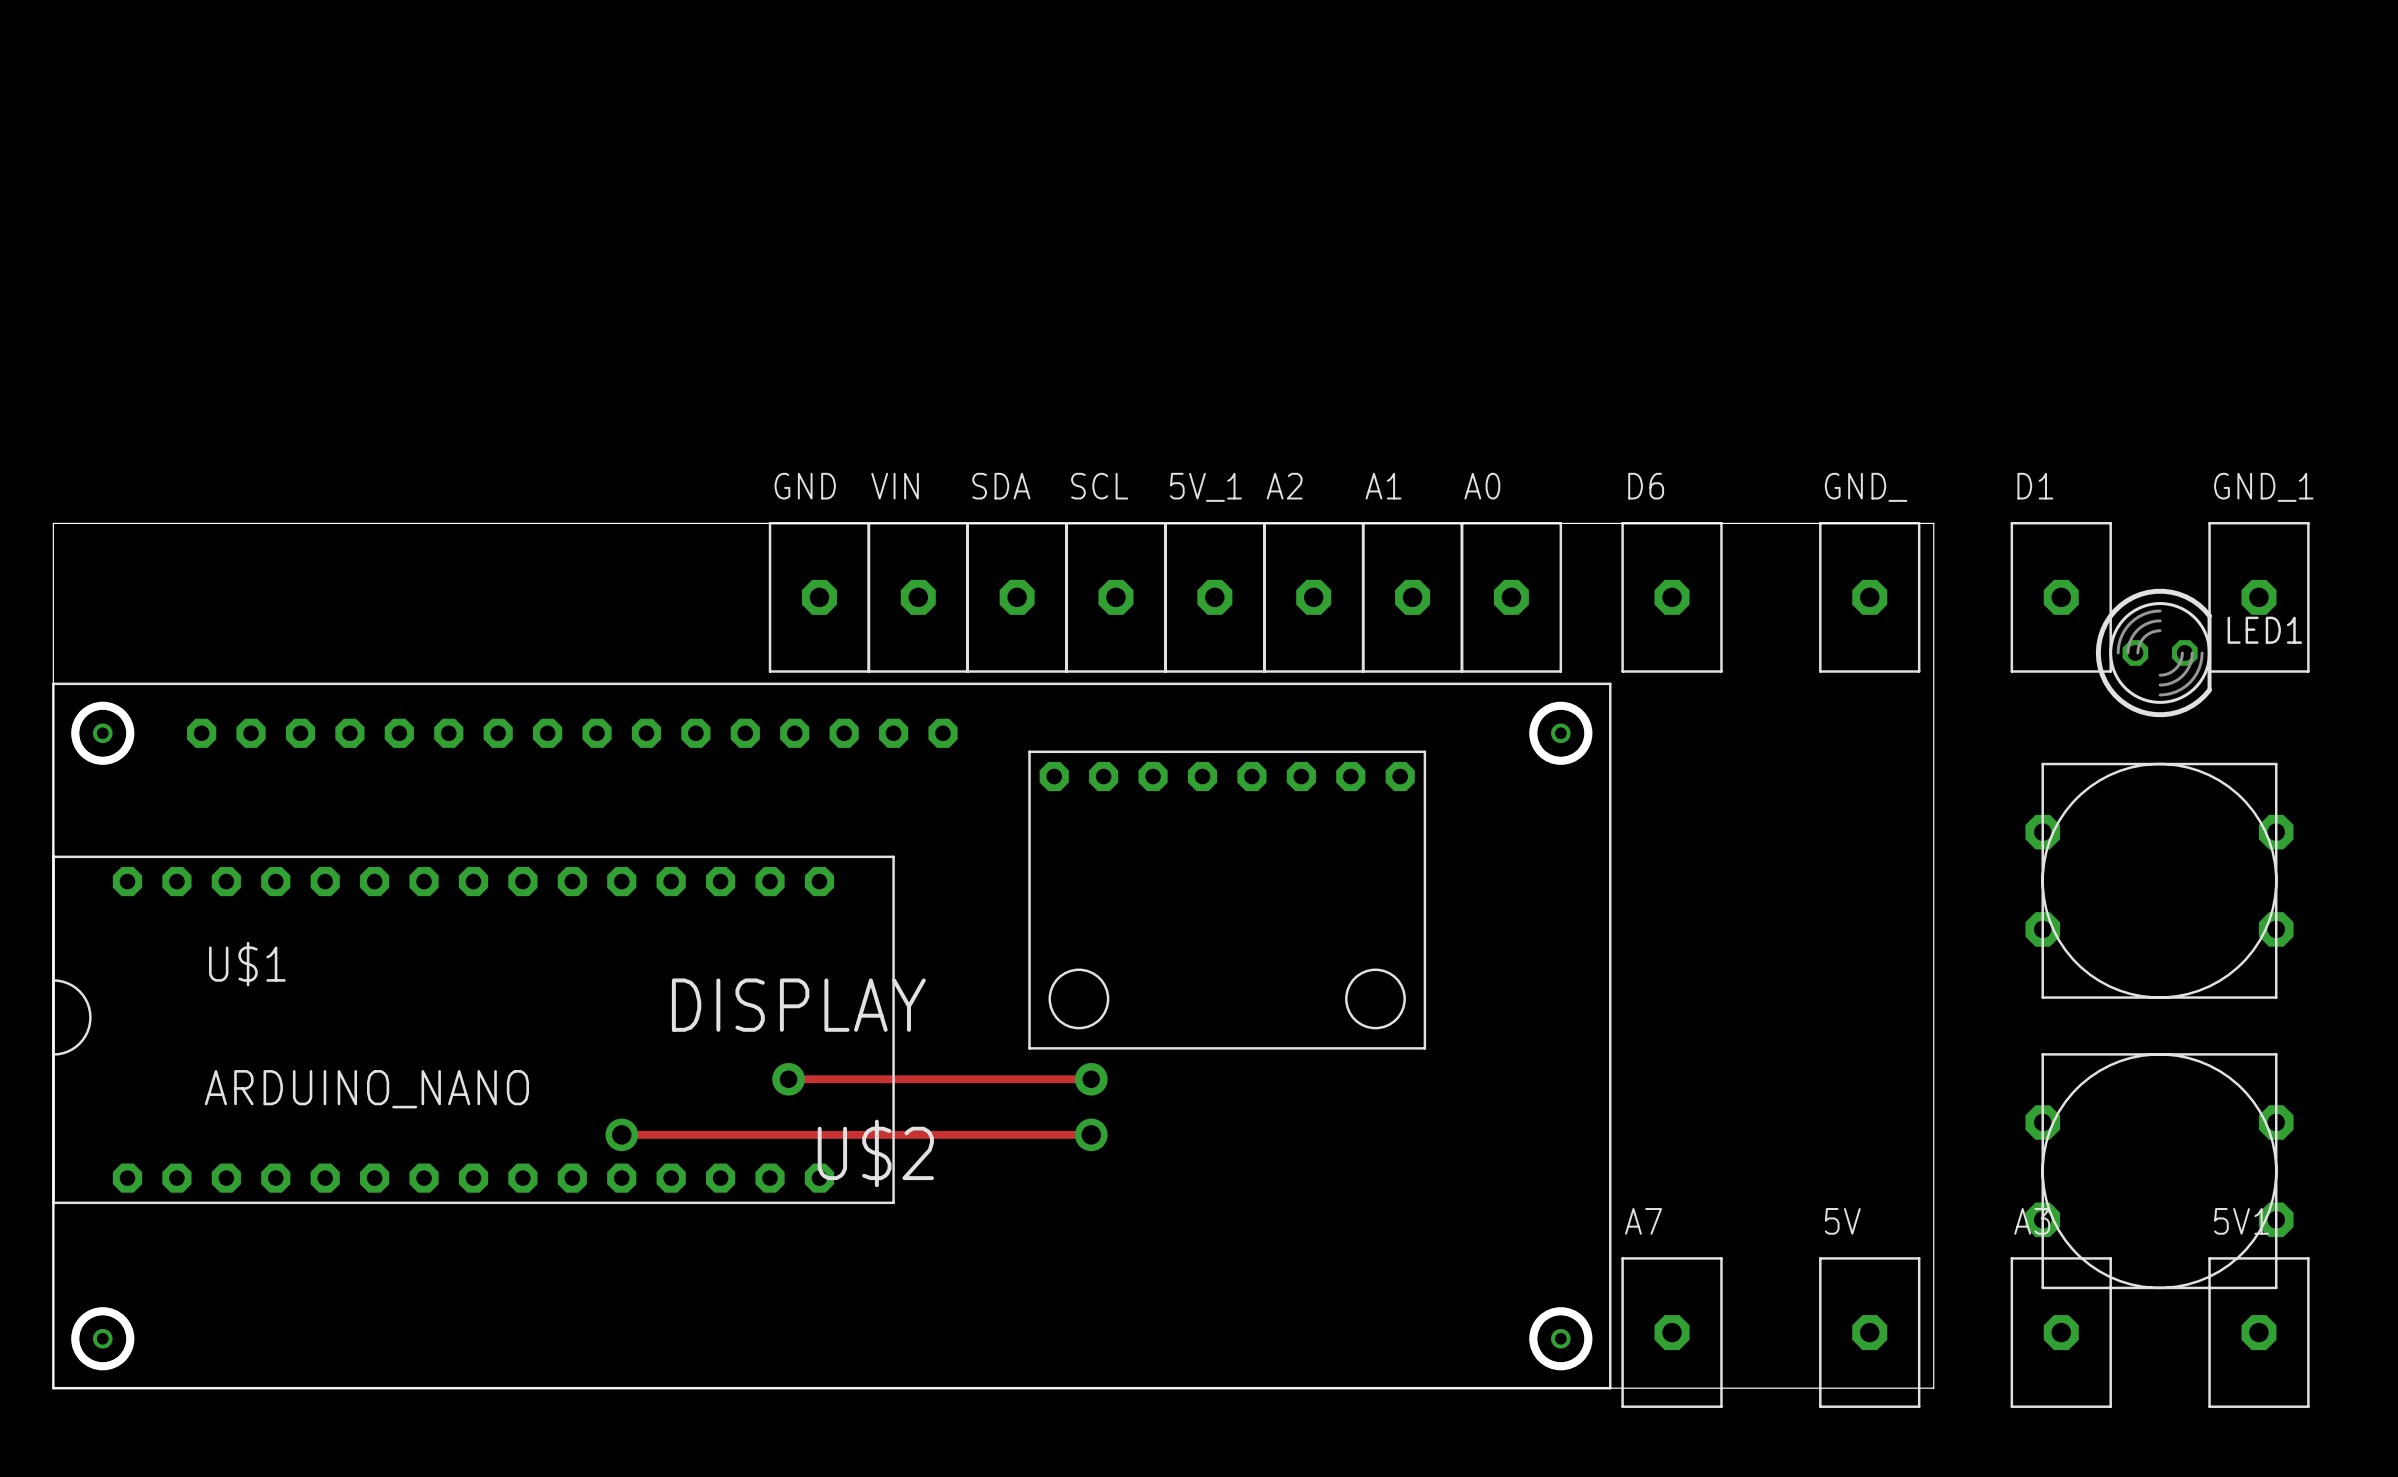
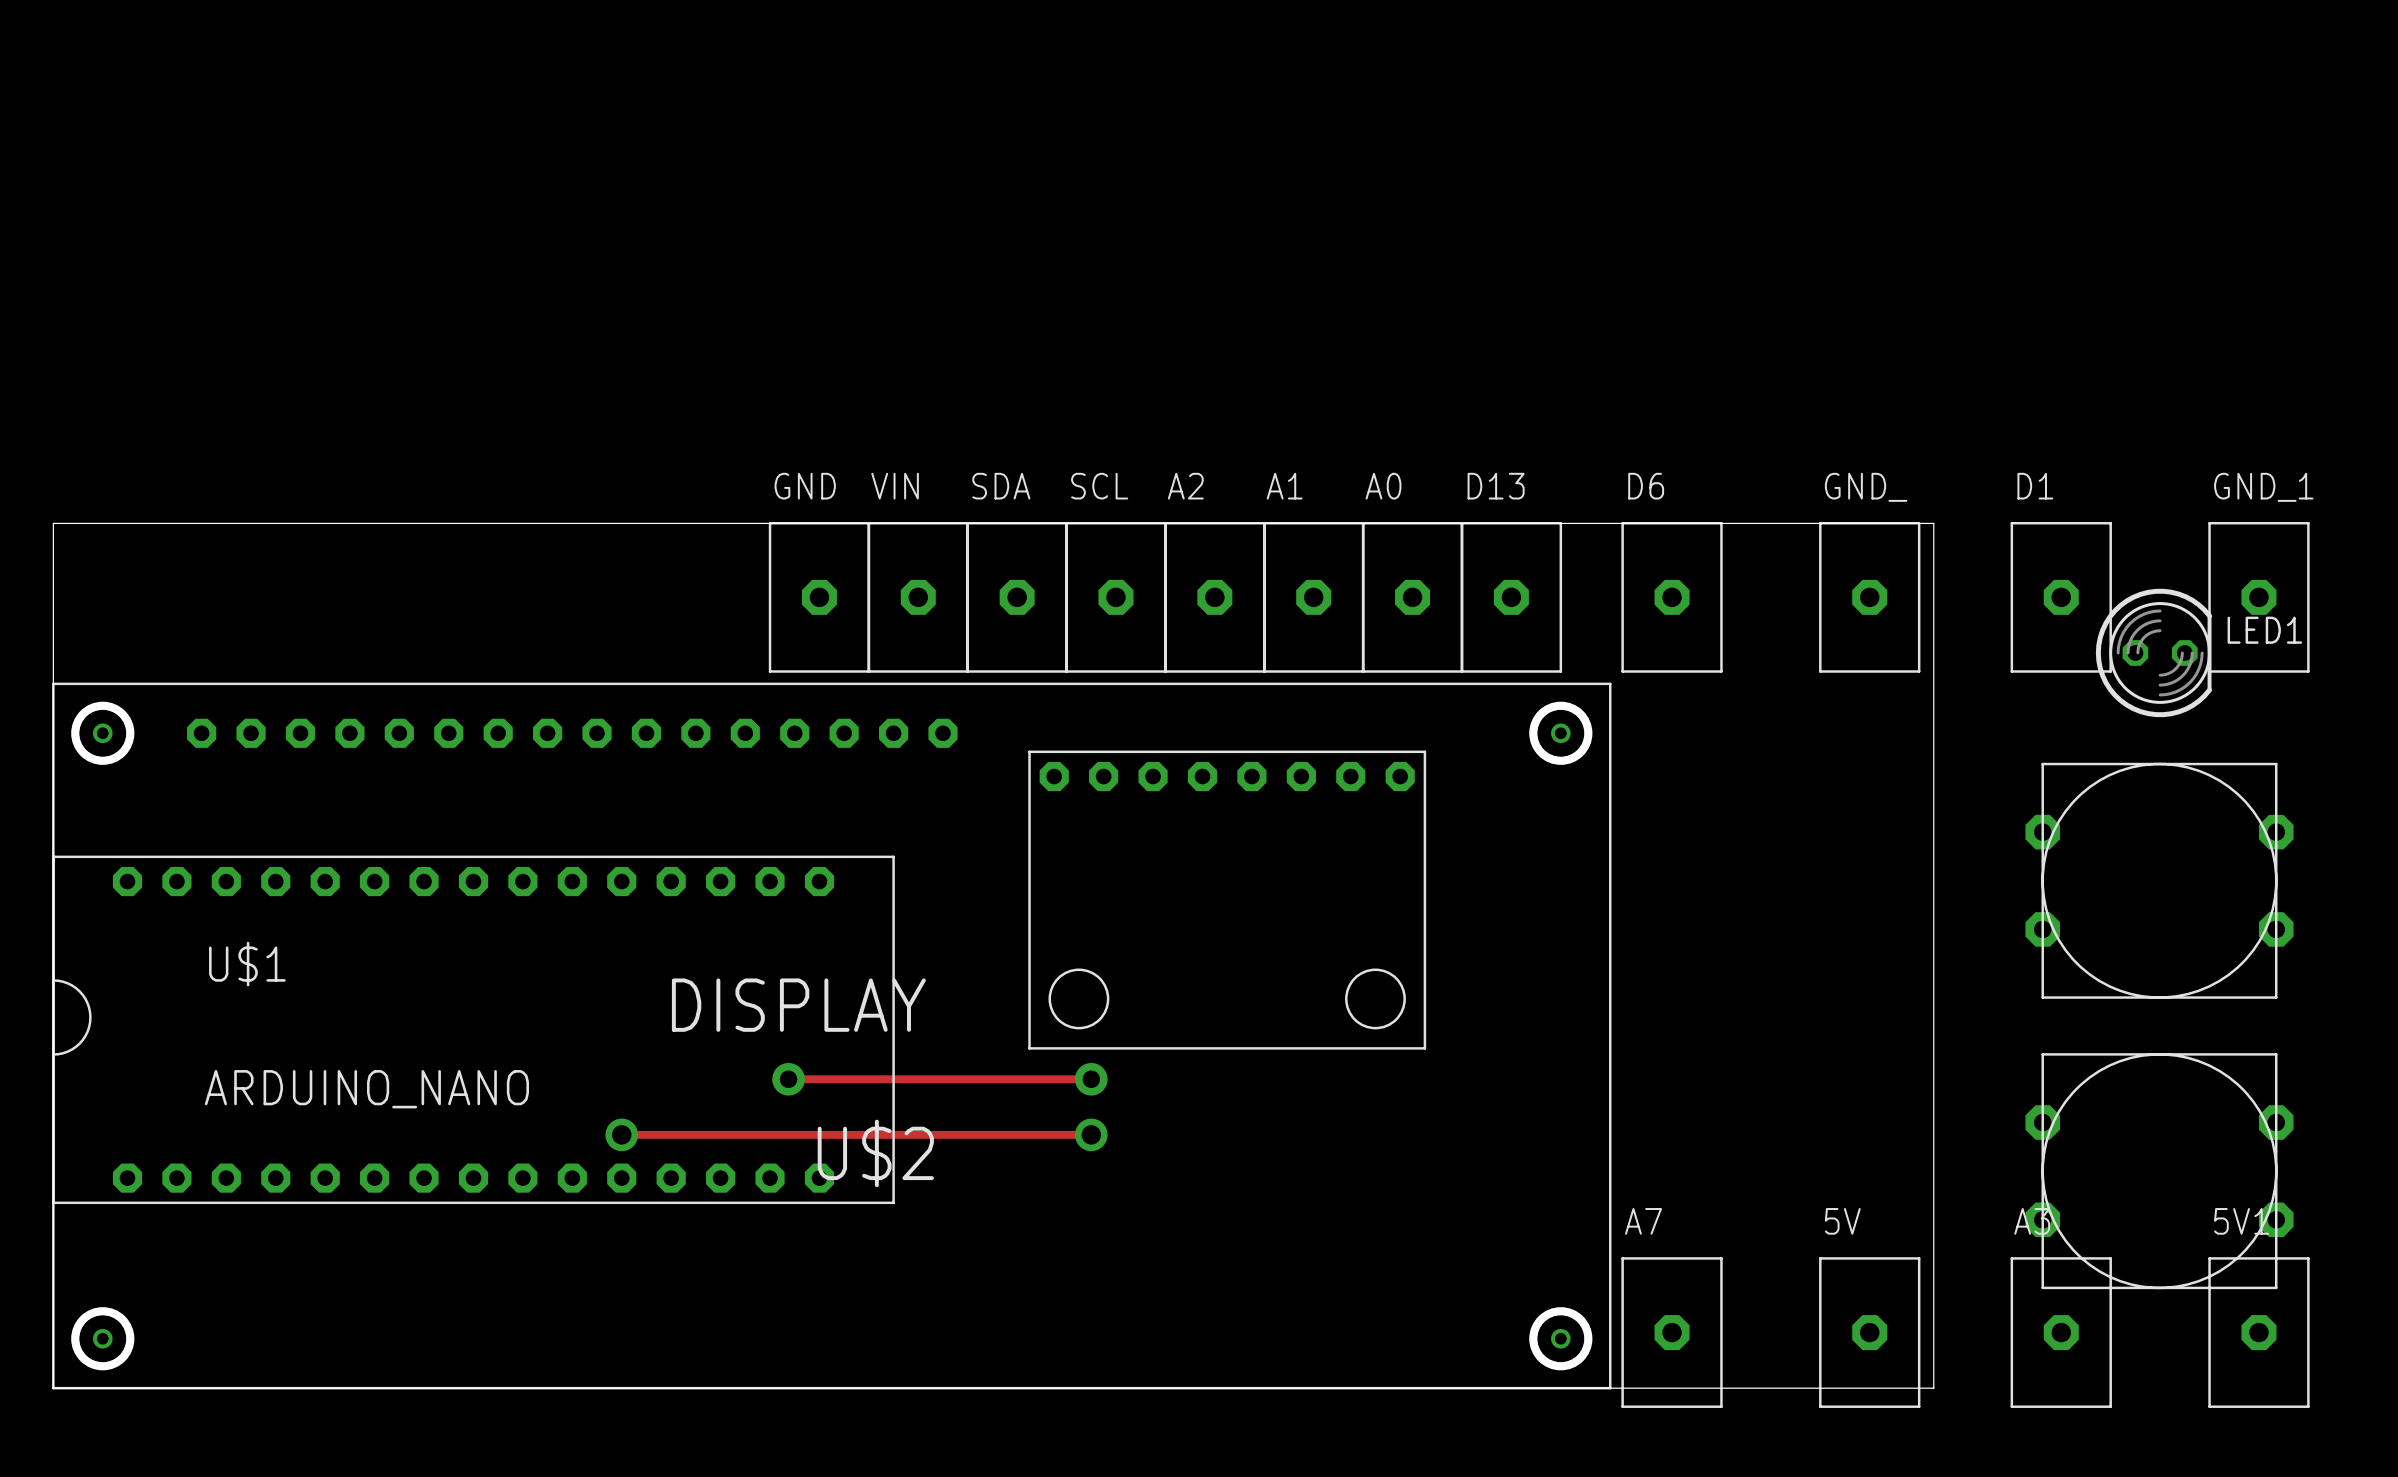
A2 name: A2 (1284, 486) -> A1 (1284, 486)
A1 name: A1 (1383, 486) -> A0 (1383, 486)
A0 name: A0 (1482, 486) -> D13 (1496, 486)
5V_1 name: 5V_1 (1205, 487) -> A2 (1185, 486)

